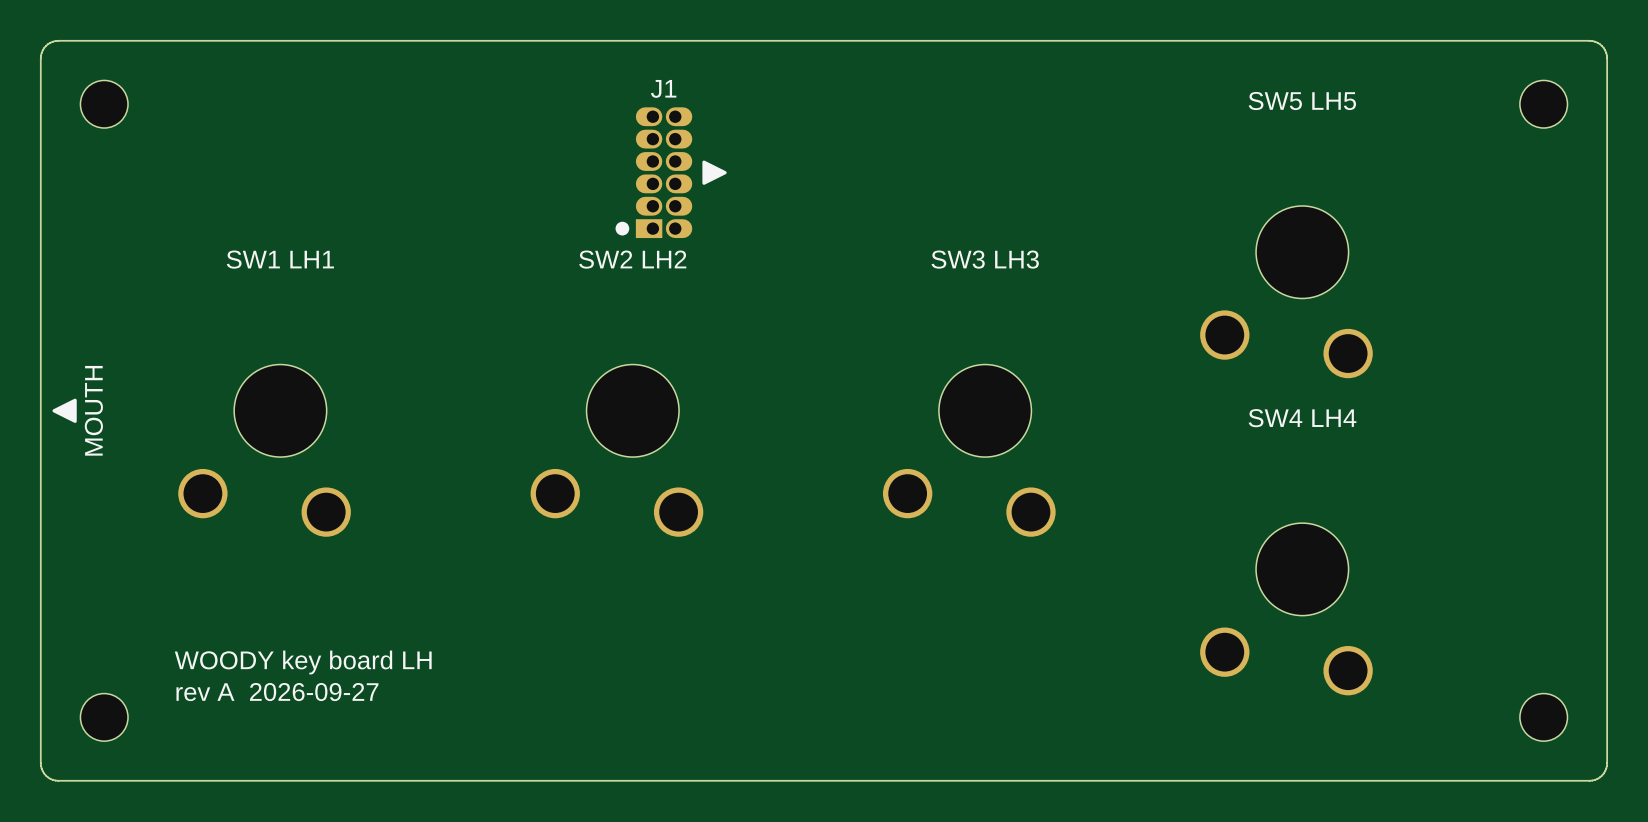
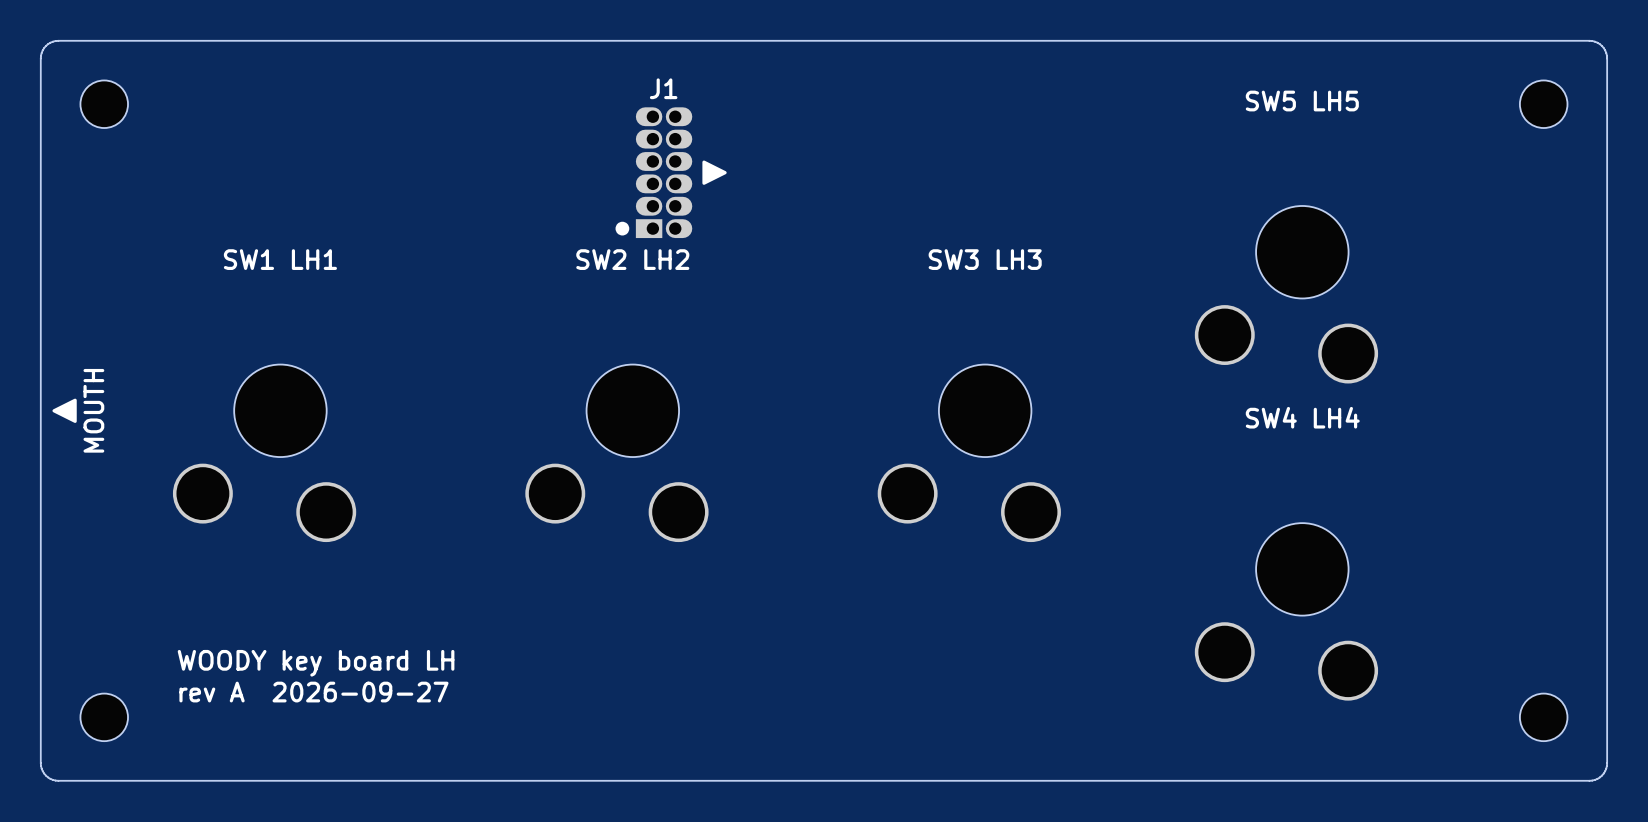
part footprint: [1200, 205, 1373, 379] -> [1194, 205, 1379, 384]
part footprint: [178, 364, 351, 537] -> [172, 364, 357, 543]
part footprint: [530, 364, 704, 537] -> [525, 364, 709, 543]
part footprint: [882, 364, 1056, 537] -> [877, 364, 1061, 543]
part footprint: [1200, 523, 1373, 696] -> [1194, 523, 1379, 701]

